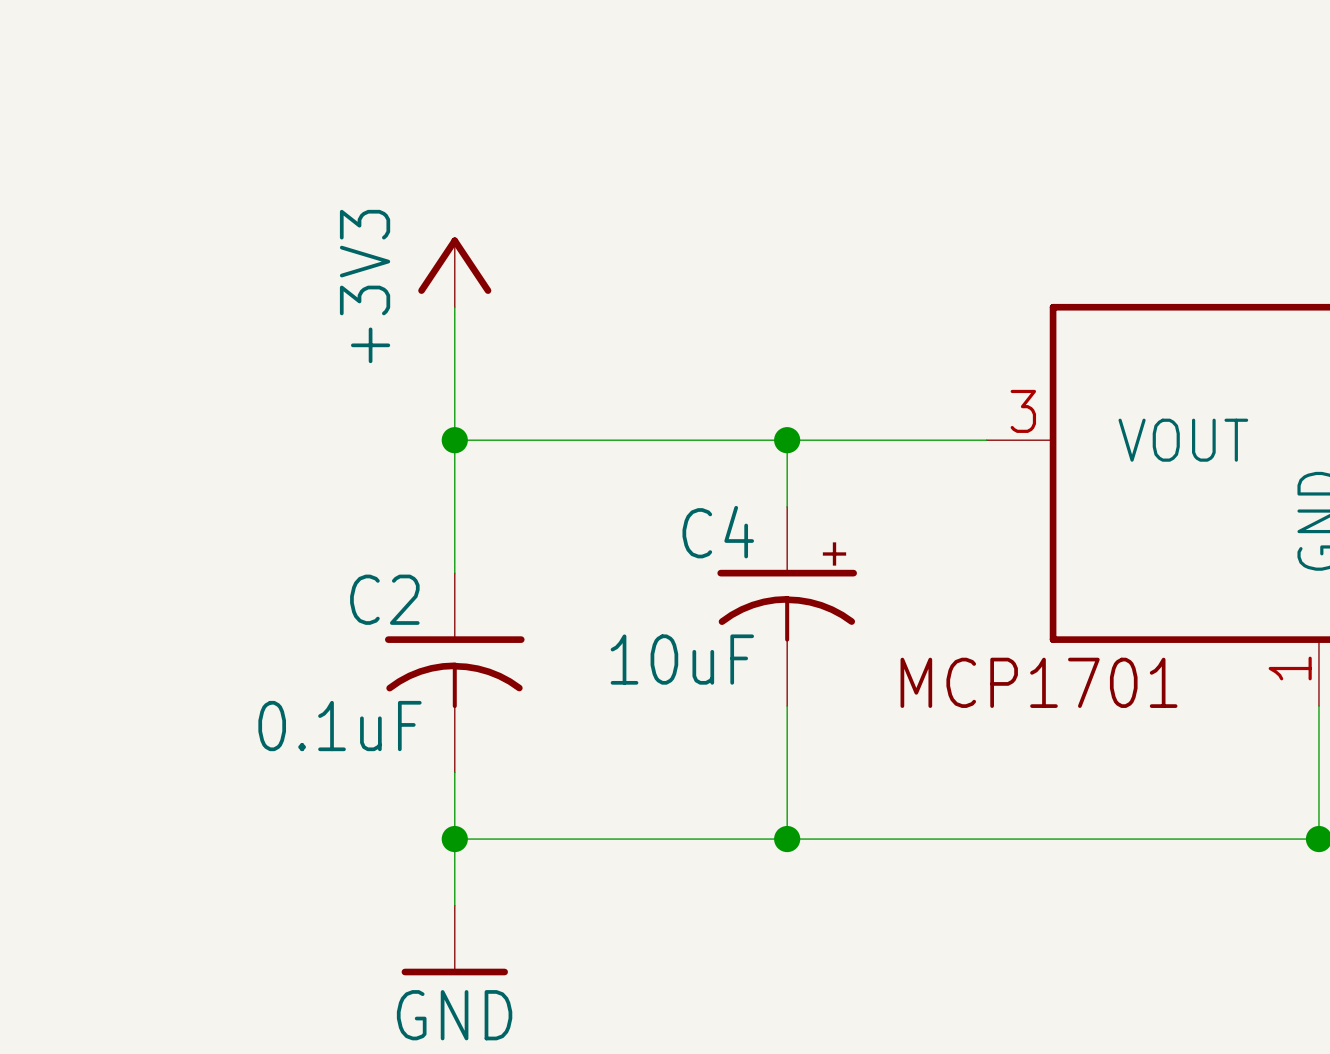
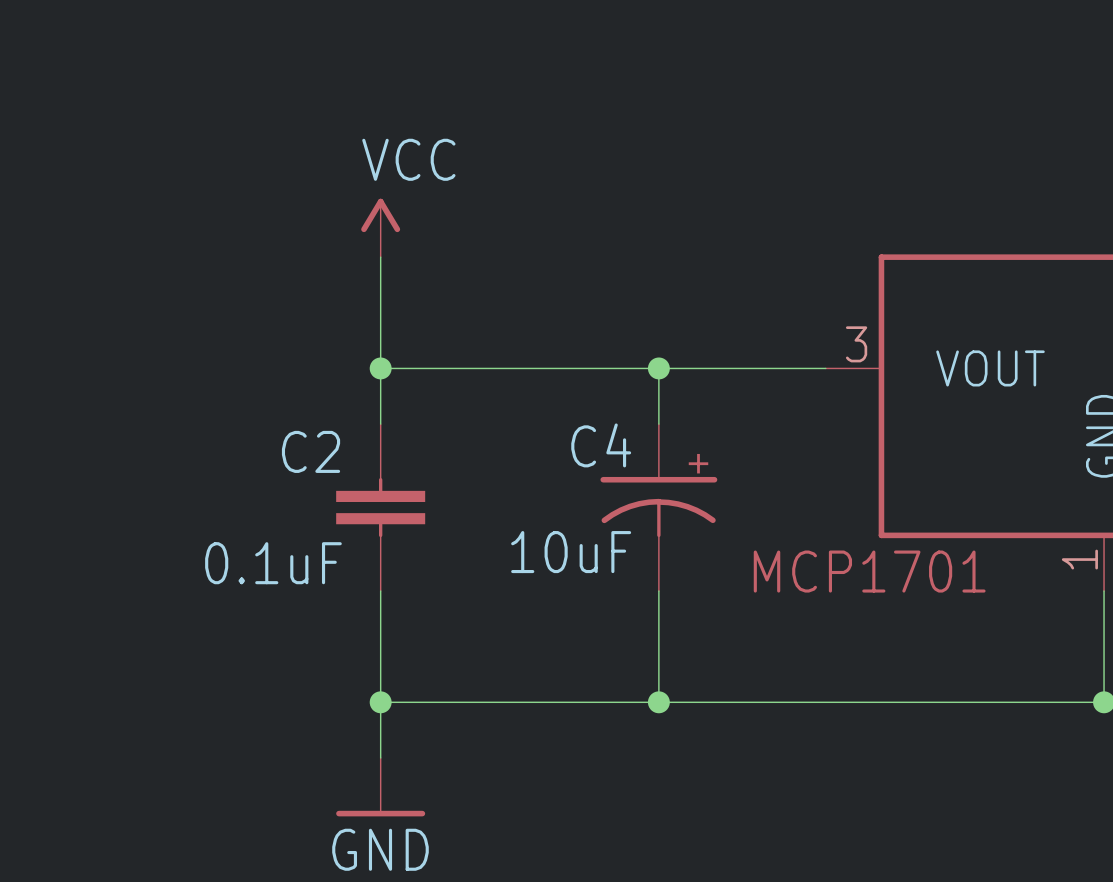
power symbol: +3V3 (454, 272) -> VCC (380, 227)
C2 symbol: [384, 573, 525, 773] -> [336, 424, 426, 592]

